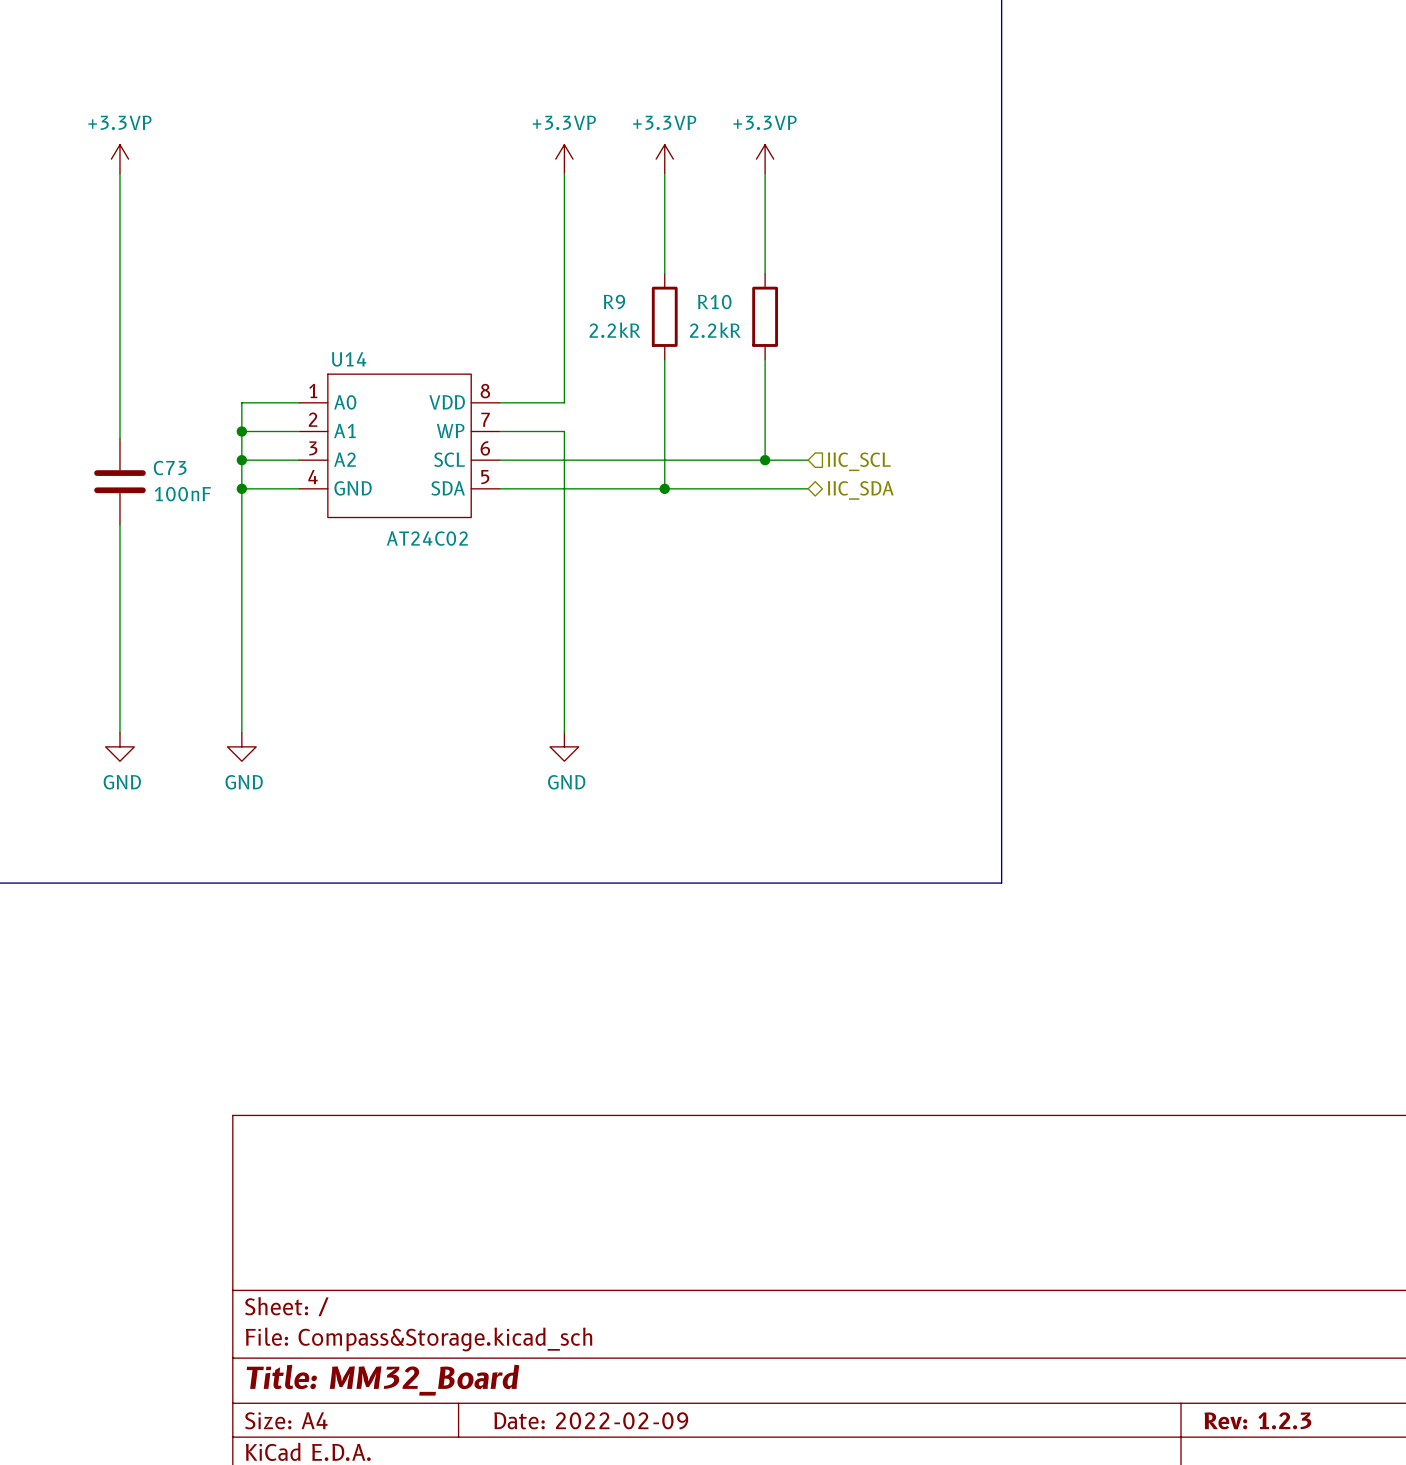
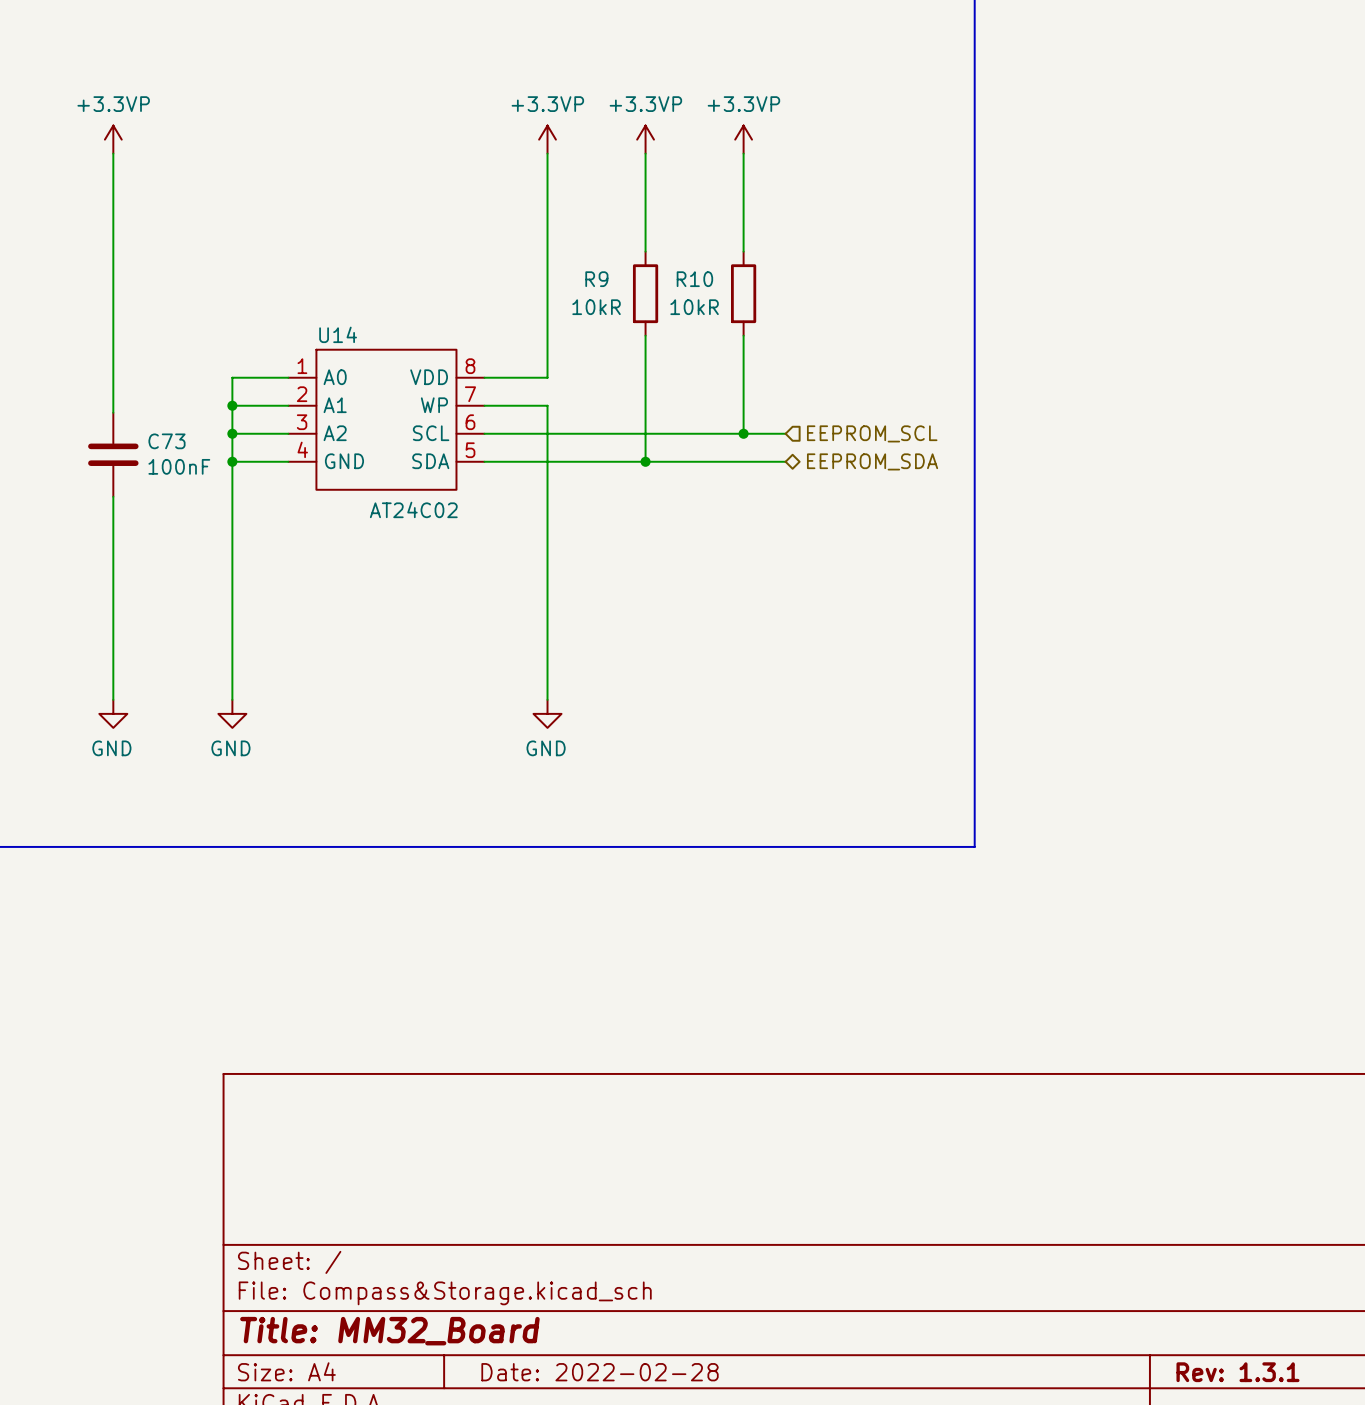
R9 value: 2.2kR (614, 330) -> 10kR (596, 307)
R10 value: 2.2kR (715, 330) -> 10kR (694, 307)
hierarchical label: IIC_SCL (859, 461) -> EEPROM_SCL (872, 433)
hierarchical label: IIC_SDA (860, 490) -> EEPROM_SDA (872, 461)
title block: Date: 2022-02-09 (591, 1420) -> Date: 2022-02-28 (600, 1372)
title block: Rev: 1.2.3 (1257, 1420) -> Rev: 1.3.1 (1237, 1372)

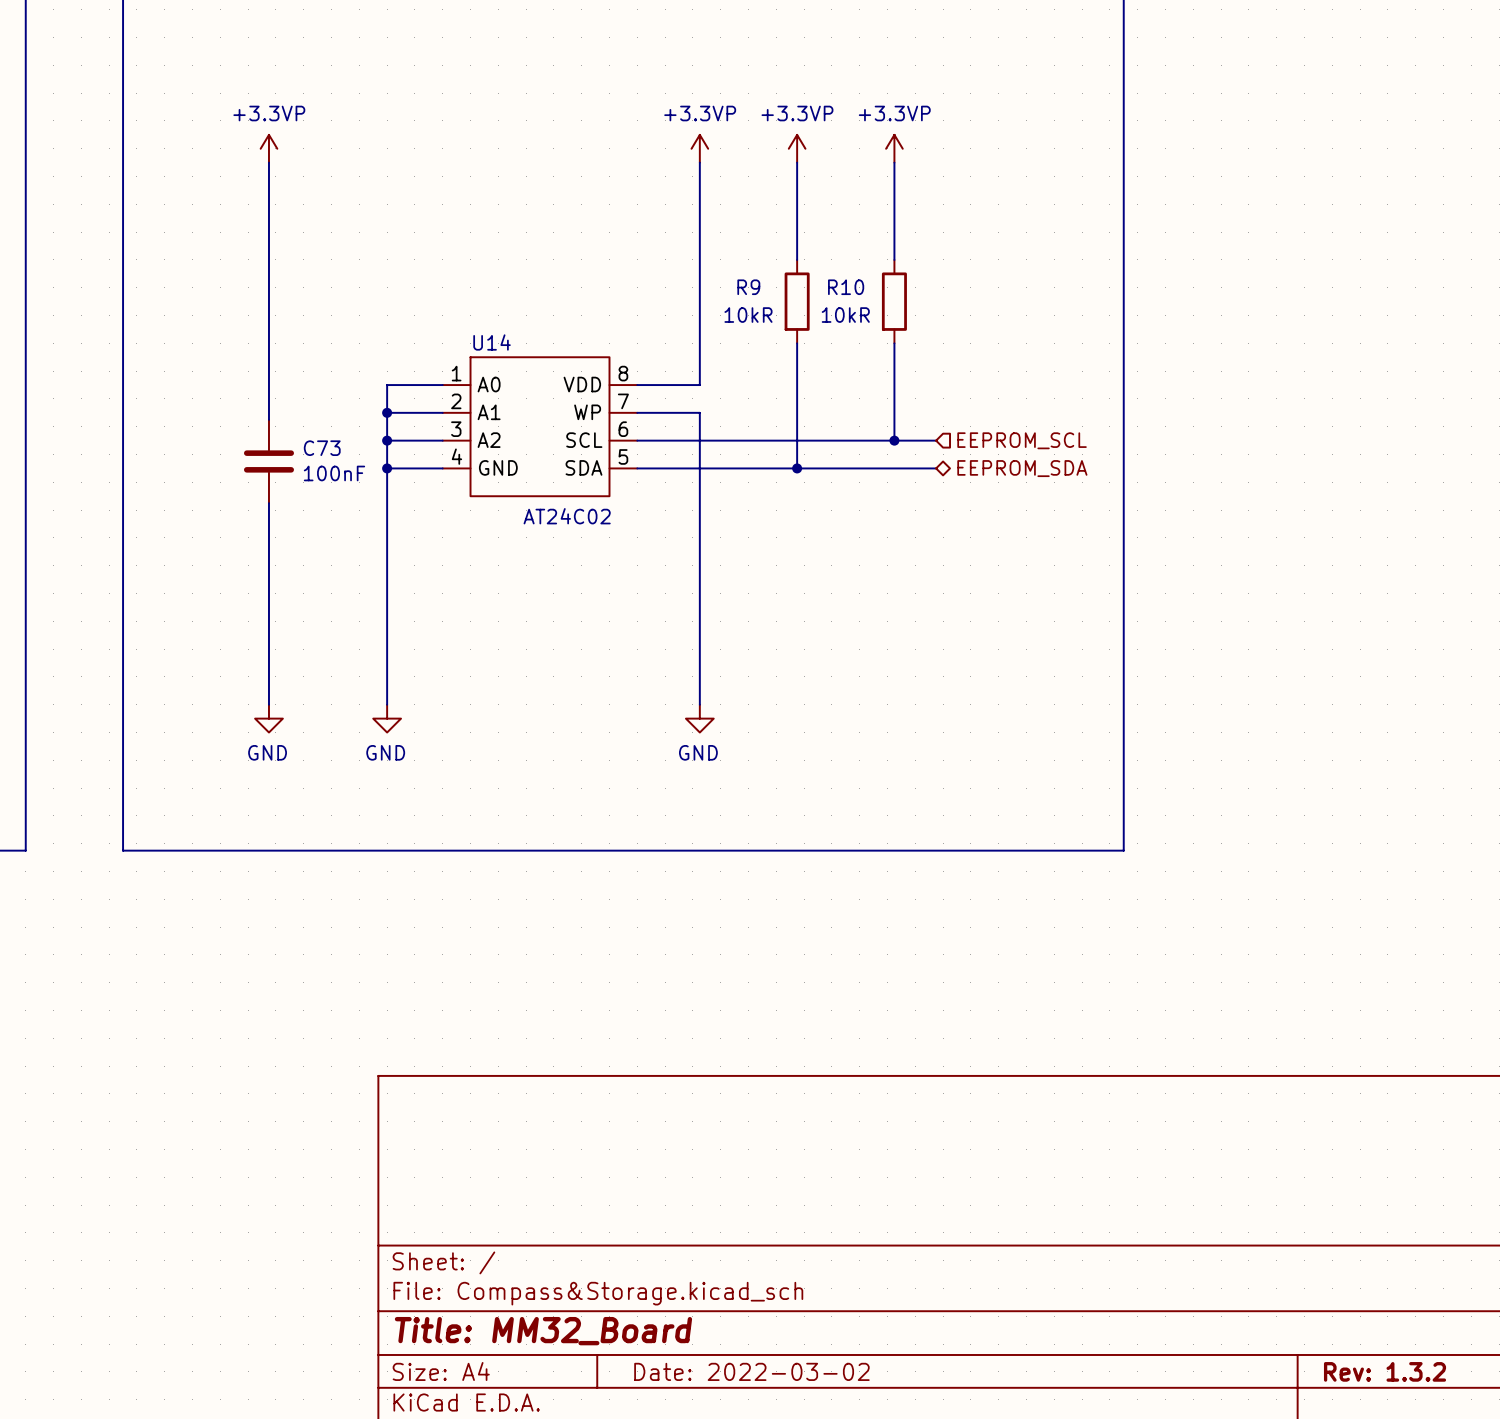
title block: Date: 2022-02-28 (600, 1372) -> Date: 2022-03-02 (751, 1371)
title block: Rev: 1.3.1 (1237, 1372) -> Rev: 1.3.2 (1385, 1371)

